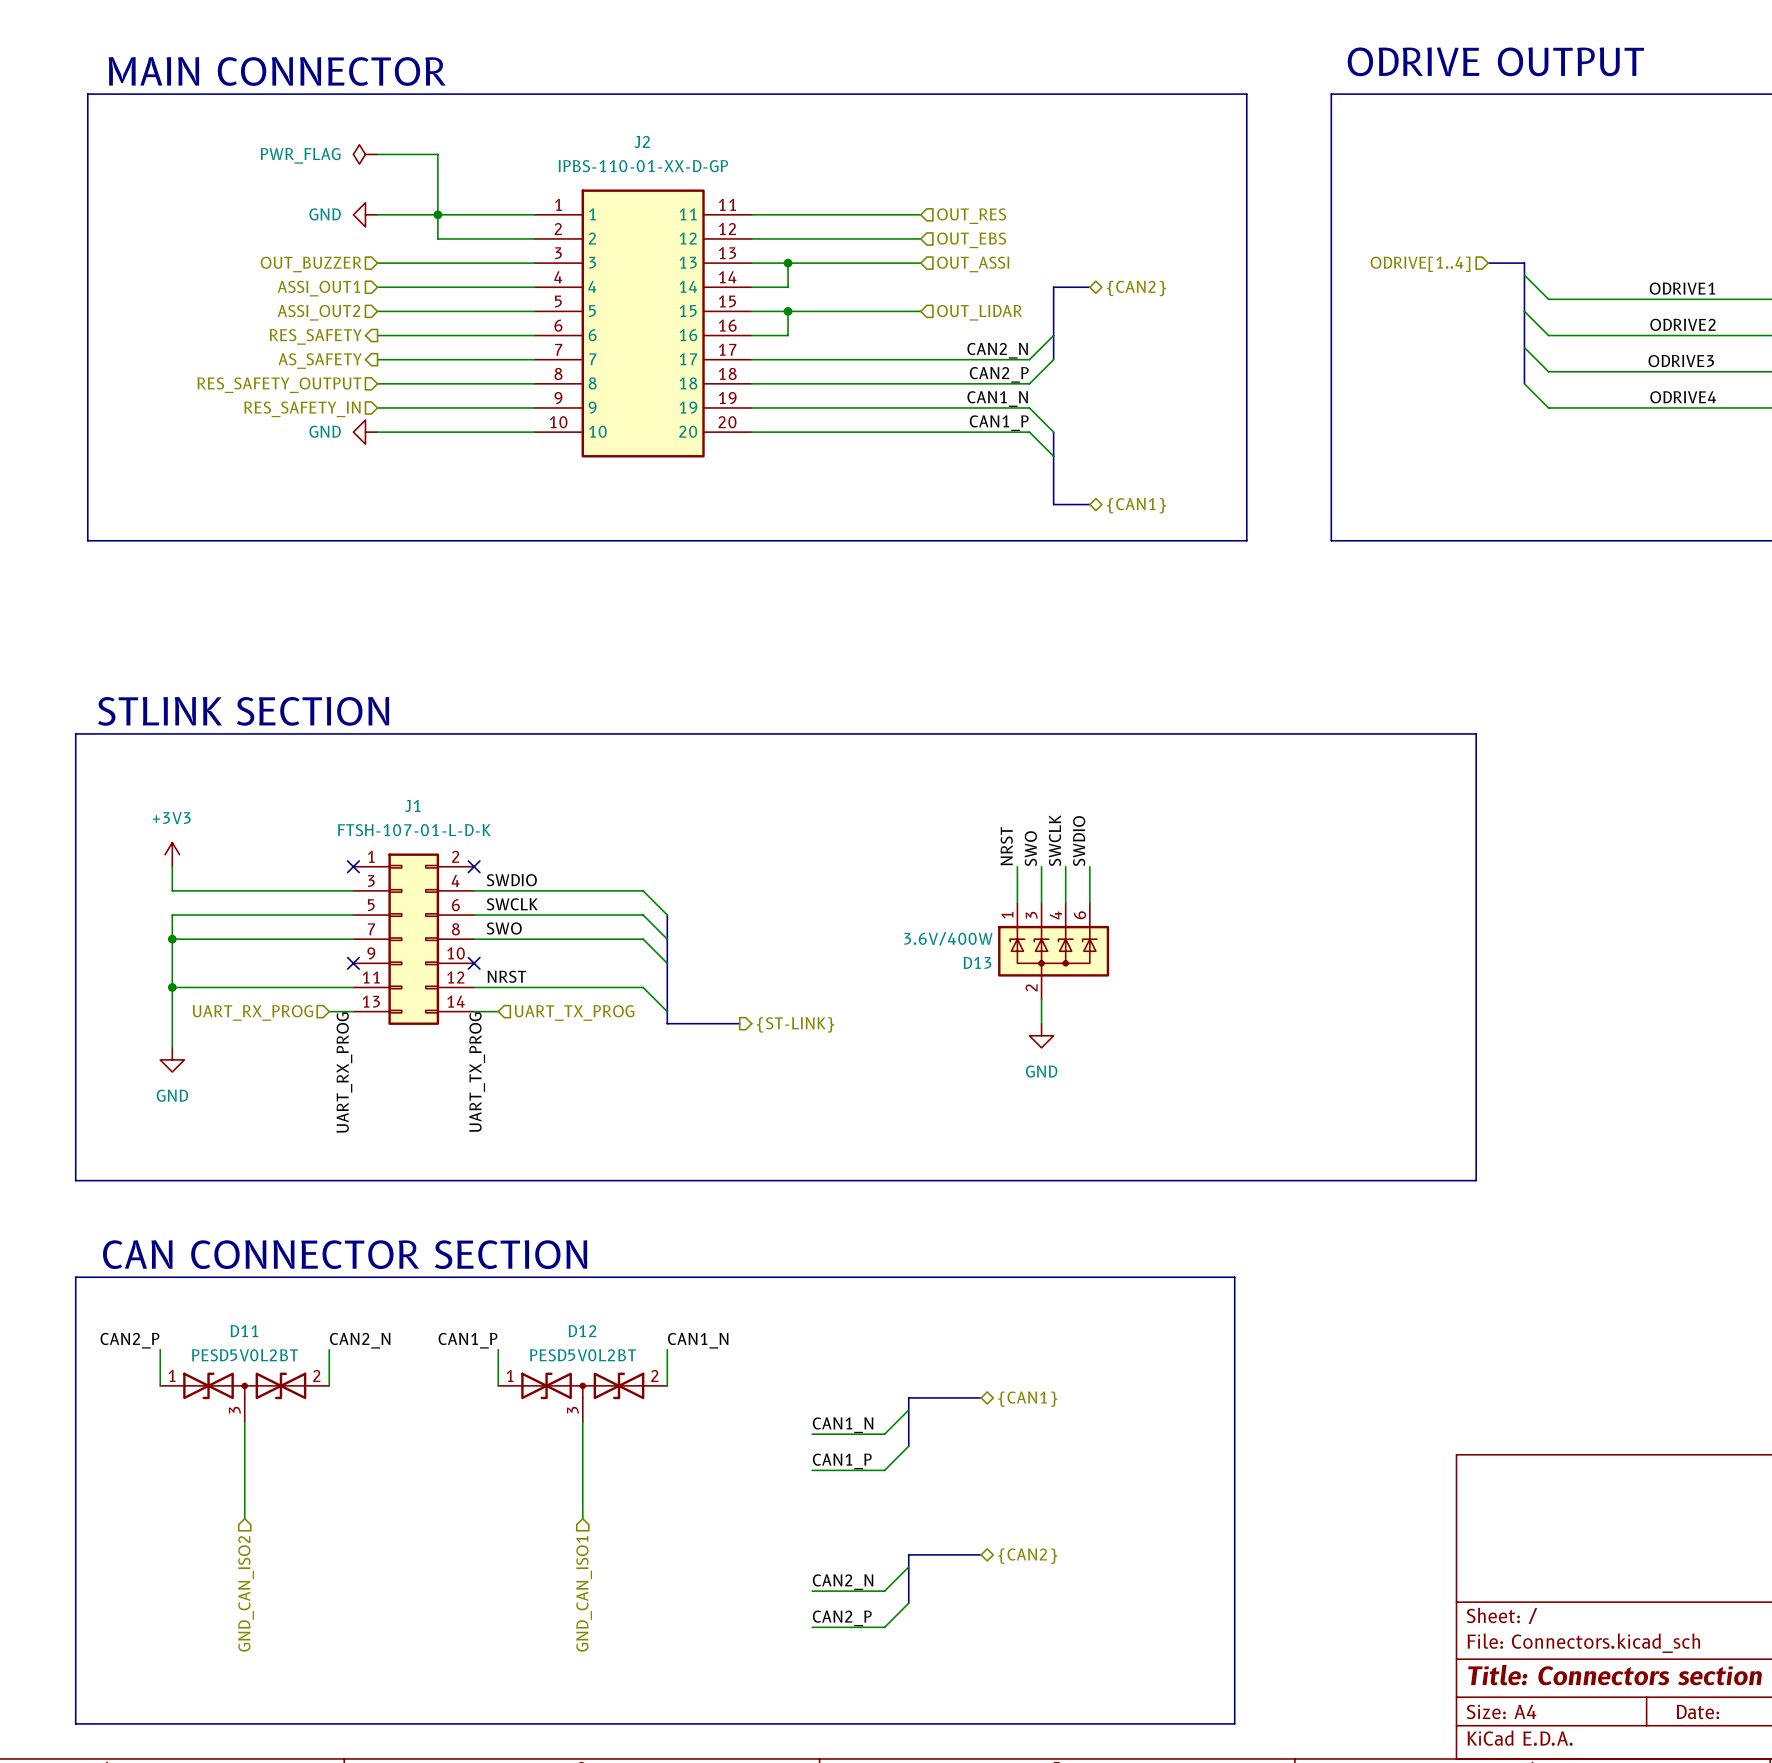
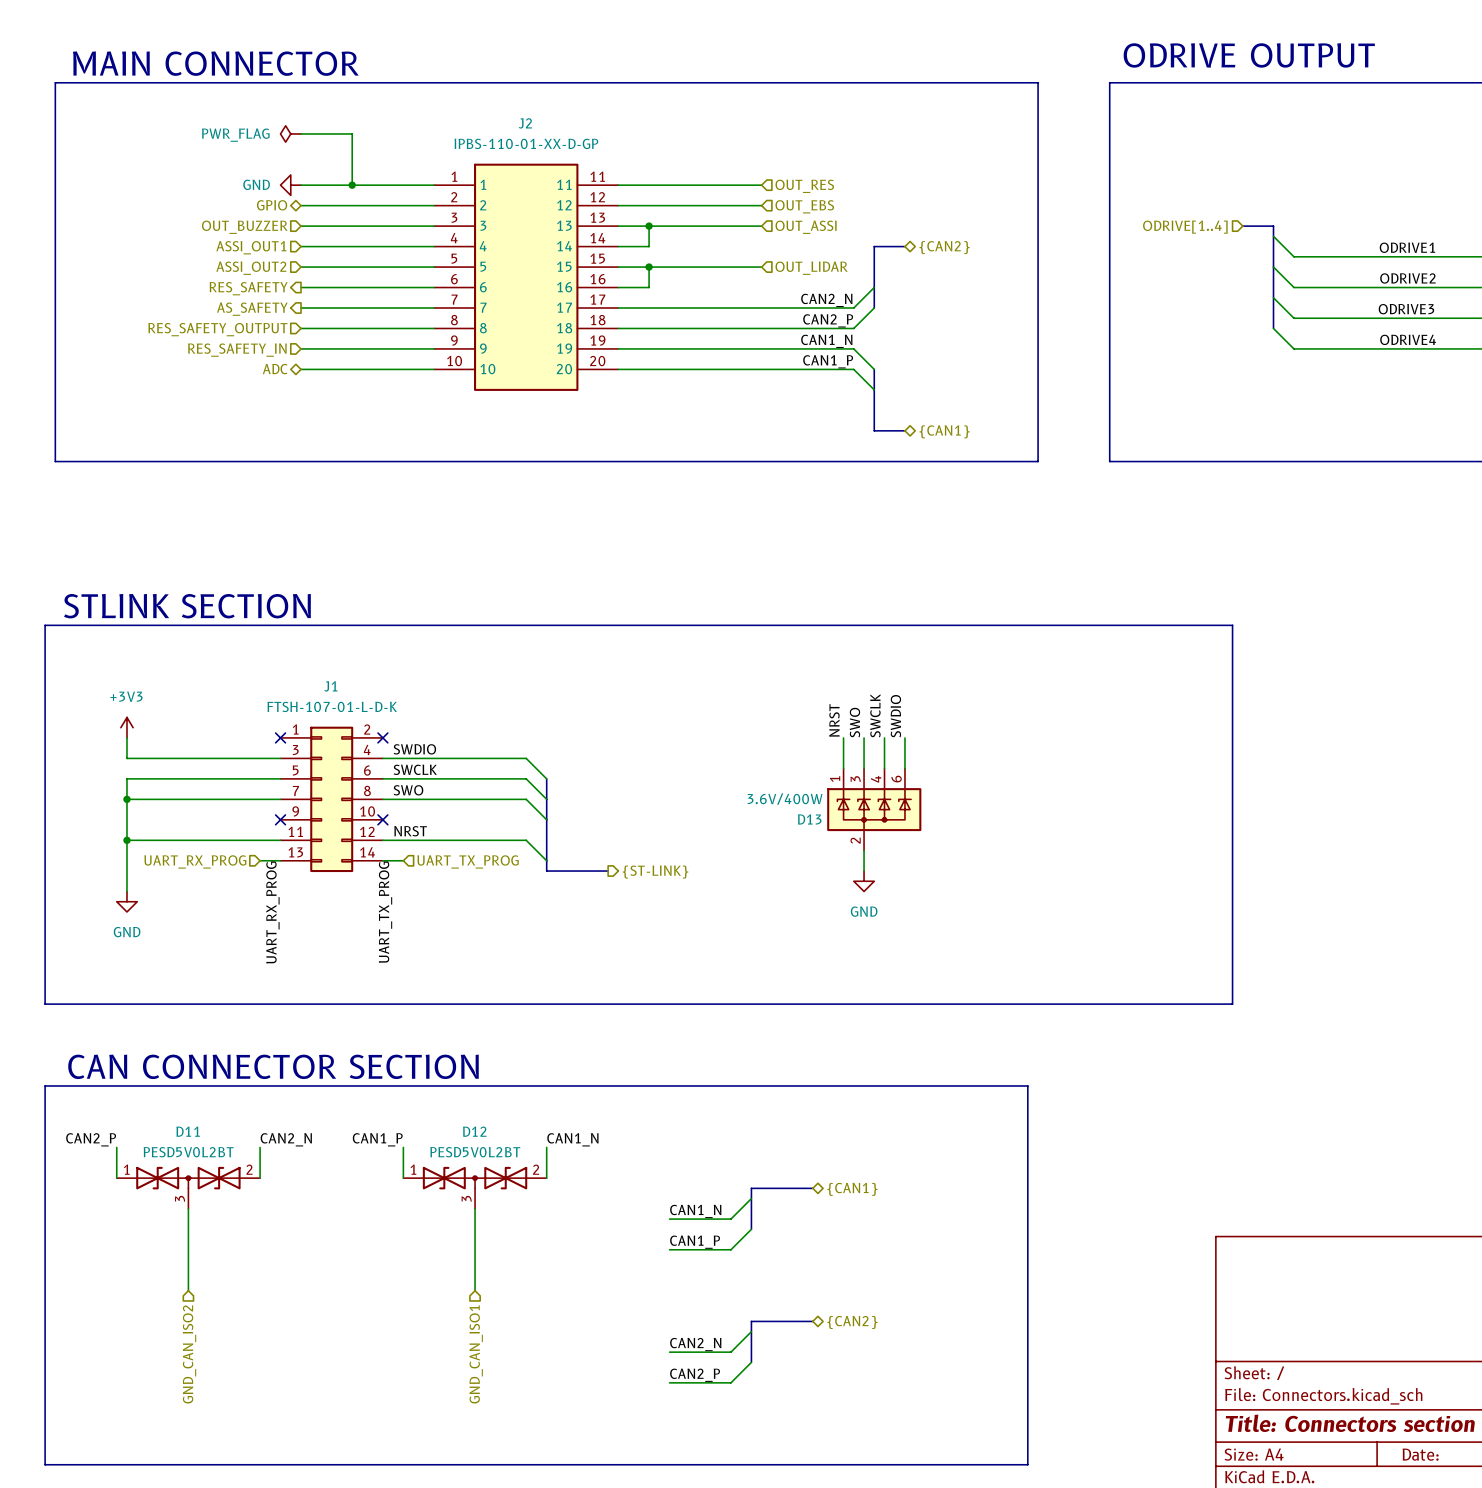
wire: (437, 214) (437, 238) -> (301, 205) (352, 205)
hierarchical label: none -> GPIO (272, 205)
hierarchical label: none -> ADC (275, 369)
power symbol: GND (365, 432) -> none

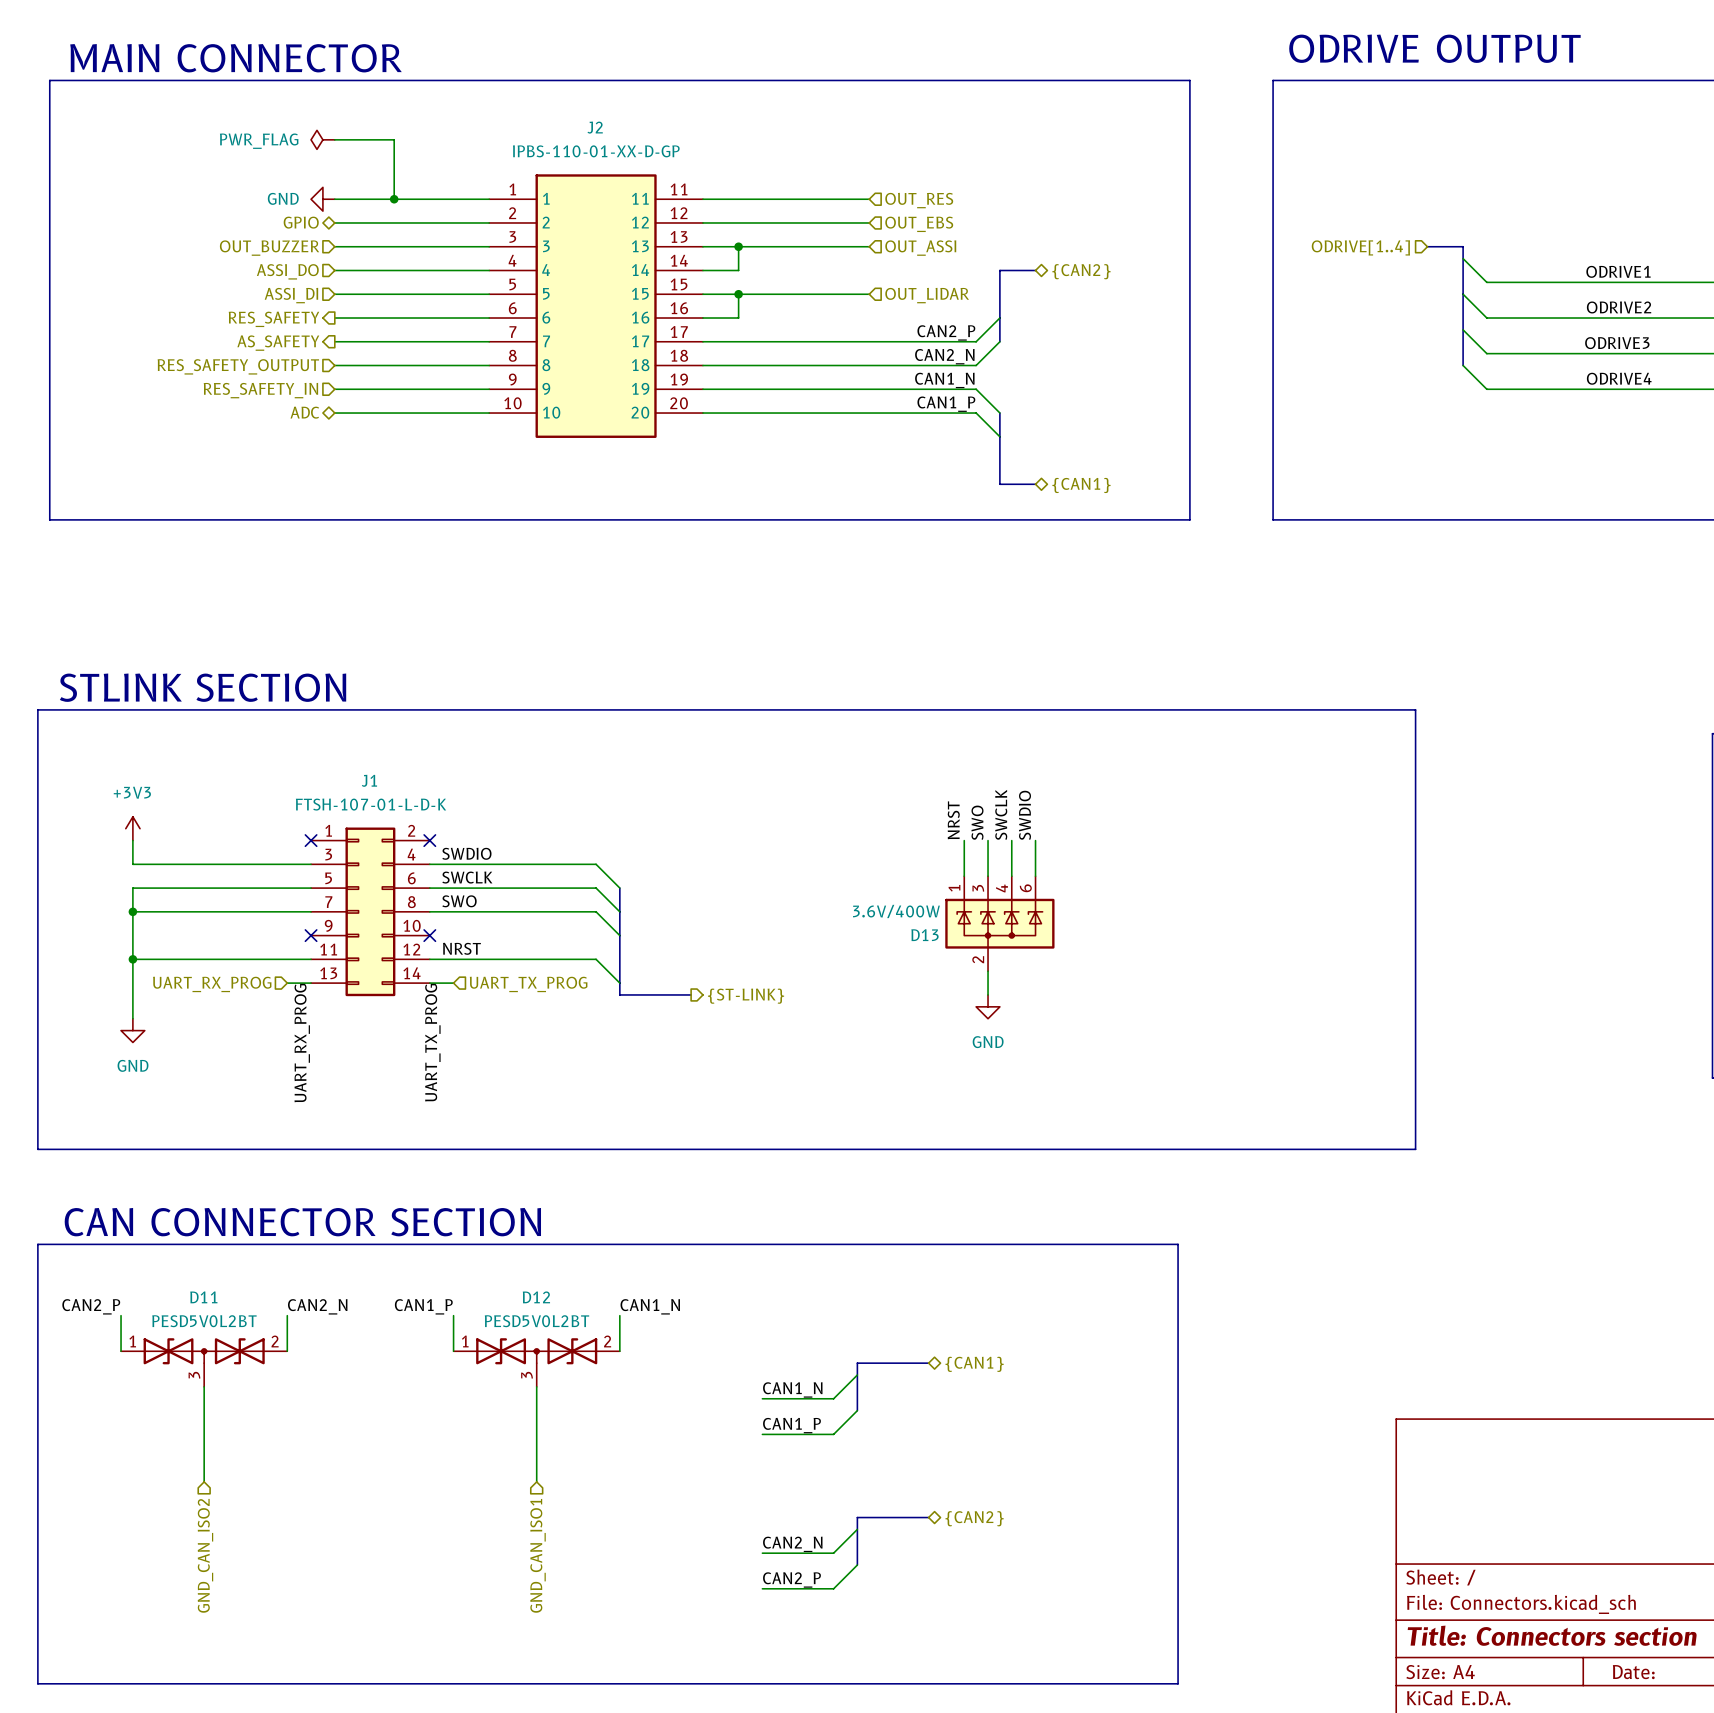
hierarchical label: ASSI_OUT1 (251, 247) -> ASSI_DO (287, 271)
hierarchical label: ASSI_OUT2 (251, 268) -> ASSI_DI (291, 295)
label: CAN2_N (826, 300) -> CAN2_P (946, 332)
label: CAN2_P (828, 320) -> CAN2_N (944, 356)

